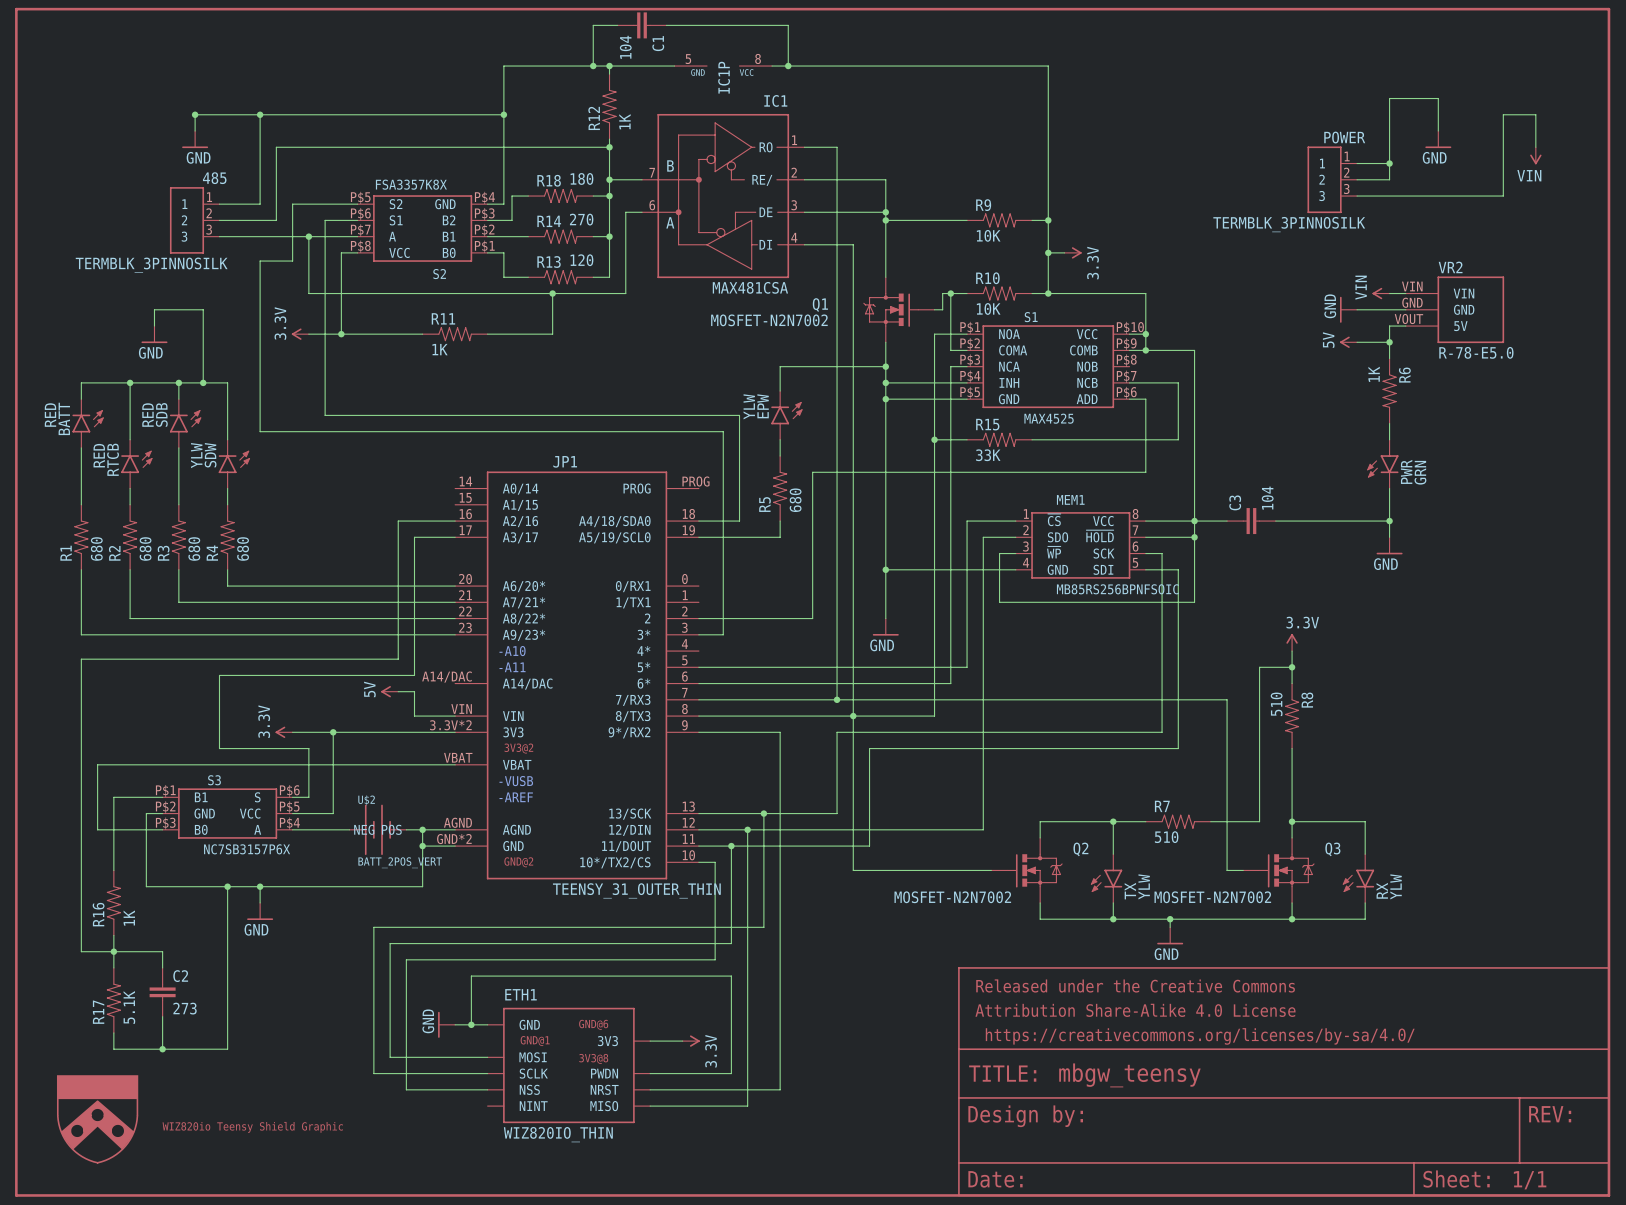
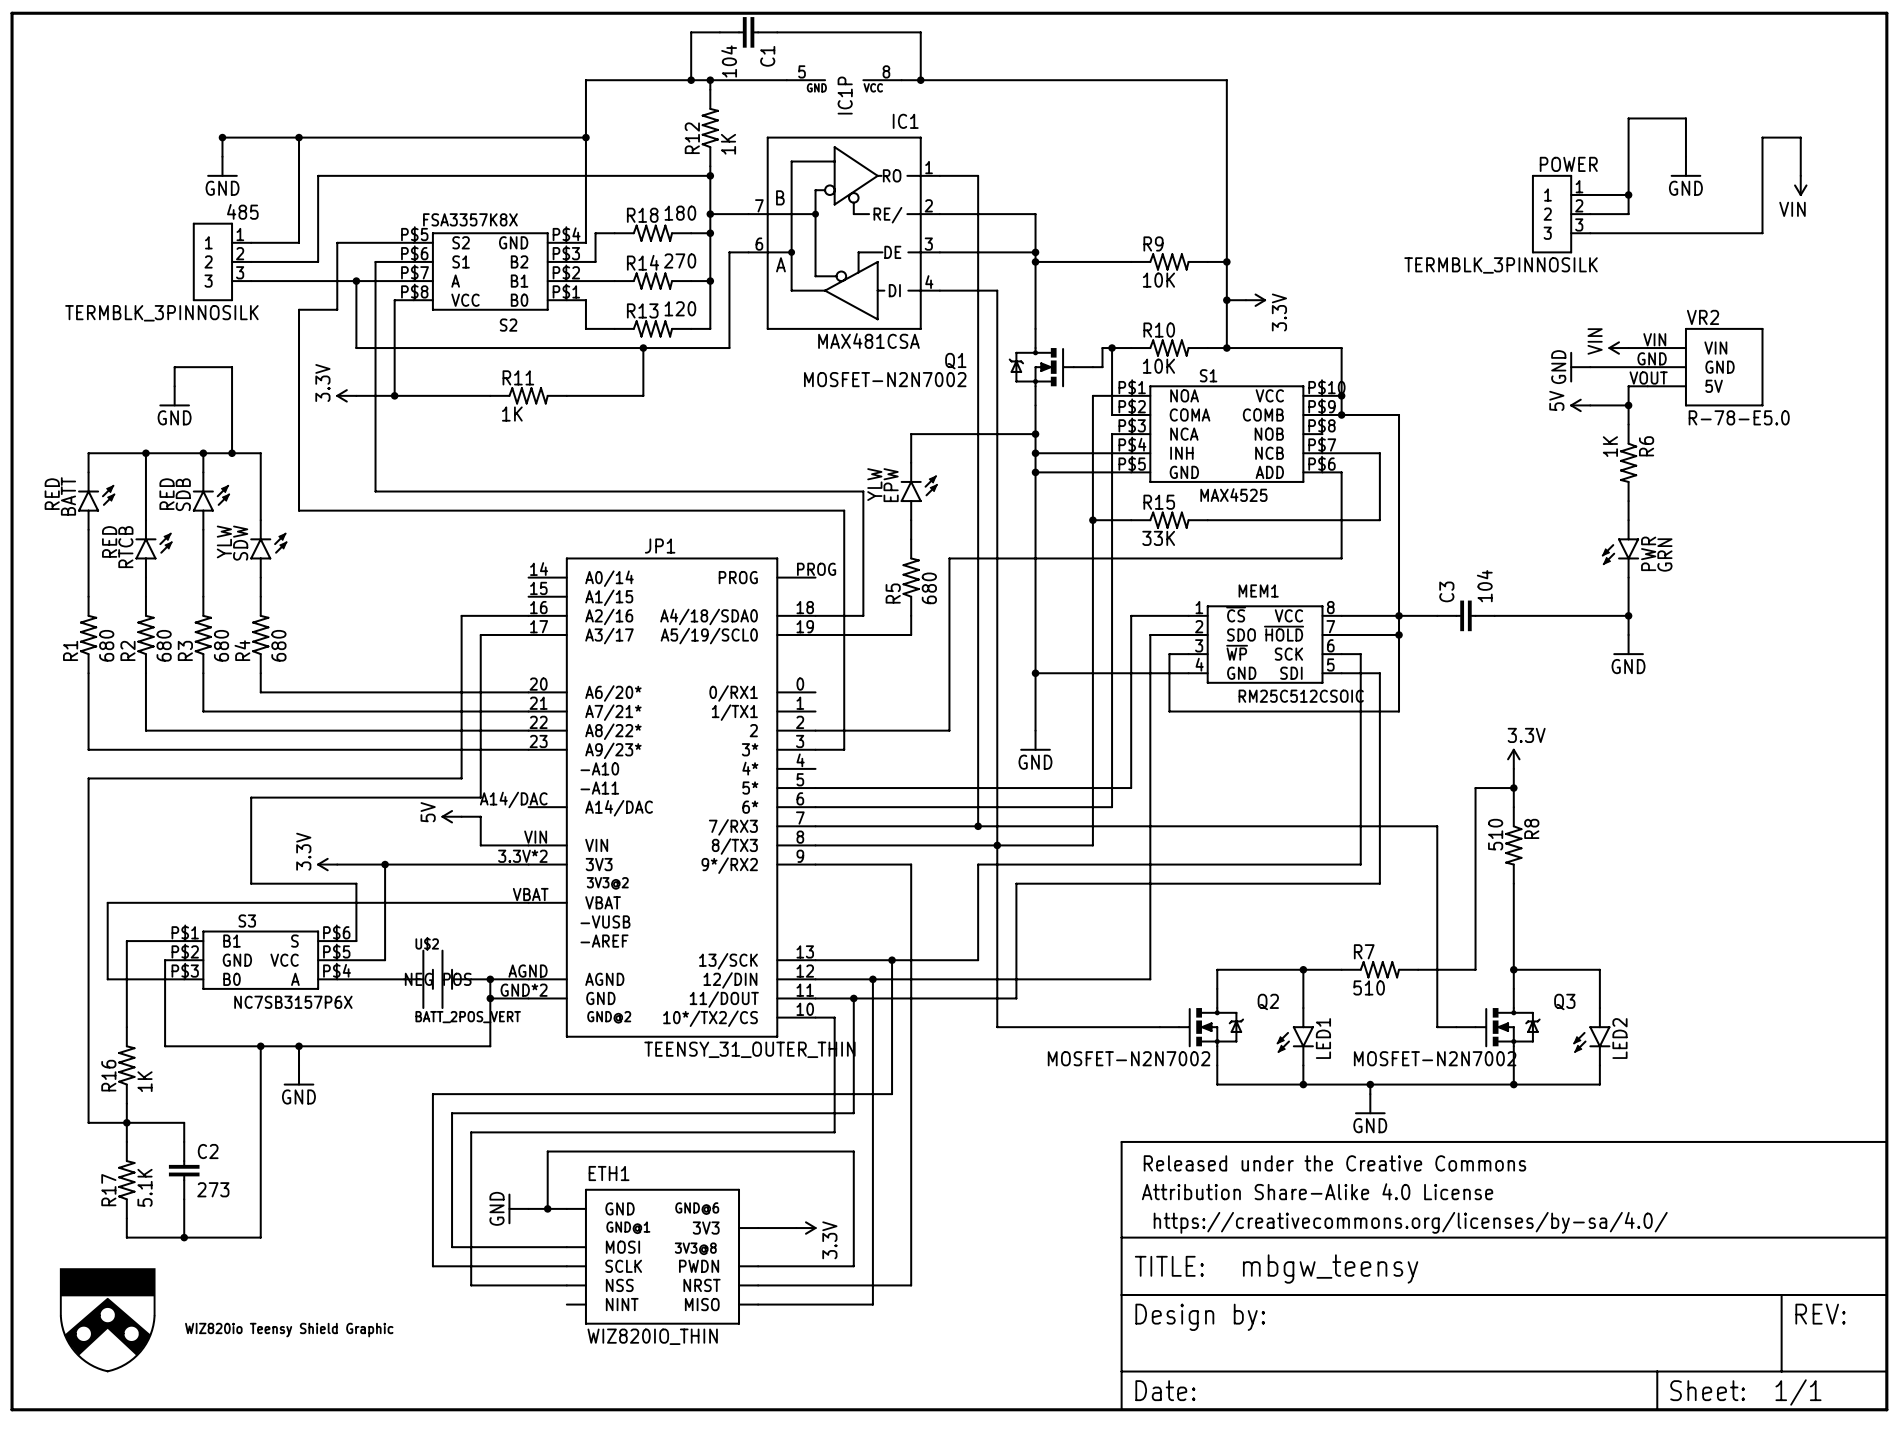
MEM1 value: MB85RS256BPNFSOIC (1117, 589) -> RM25C512CSOIC (1301, 696)
TX value: YLW (1144, 886) -> none
RX value: YLW (1396, 886) -> none
RX name: RX (1382, 890) -> LED2 (1619, 1038)
TX name: TX (1130, 891) -> LED1 (1323, 1038)

